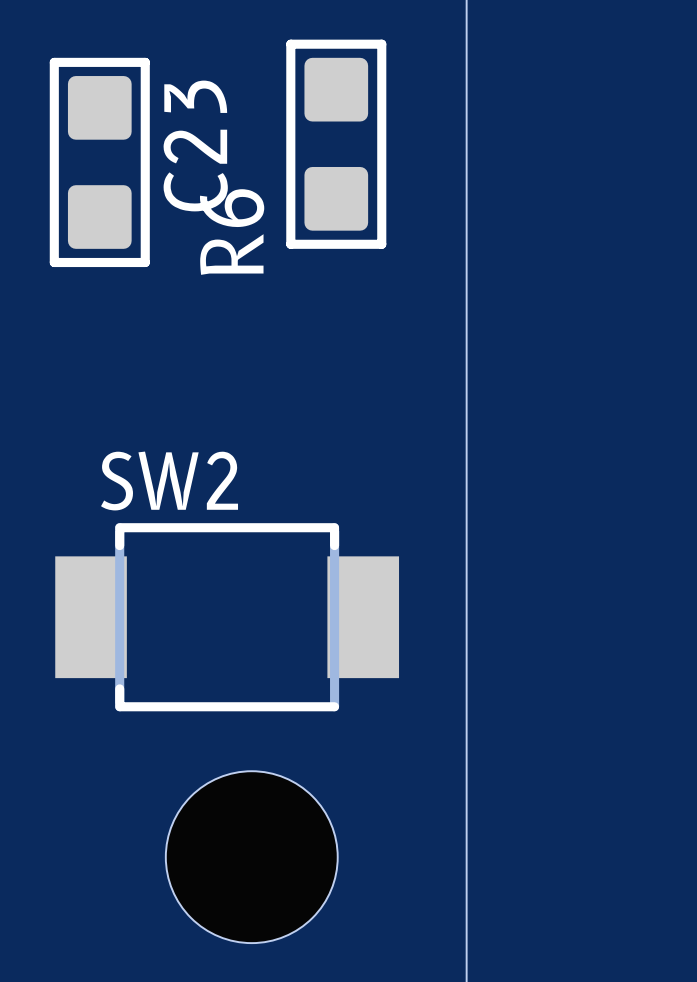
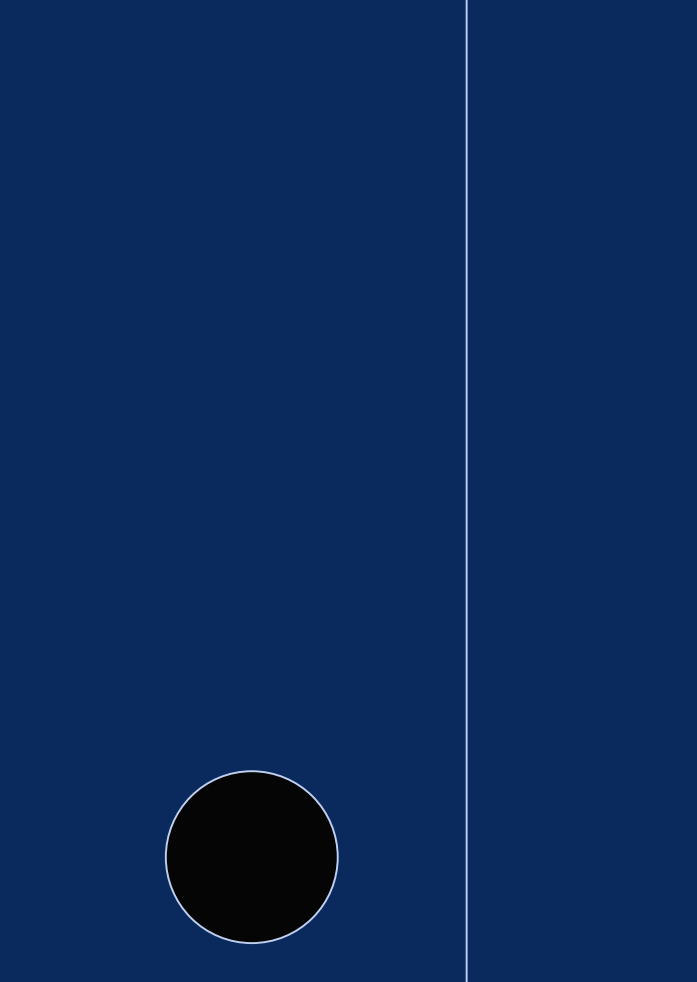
R6: (336, 144) -> none
C23: (99, 162) -> none
SW2: (227, 617) -> none

